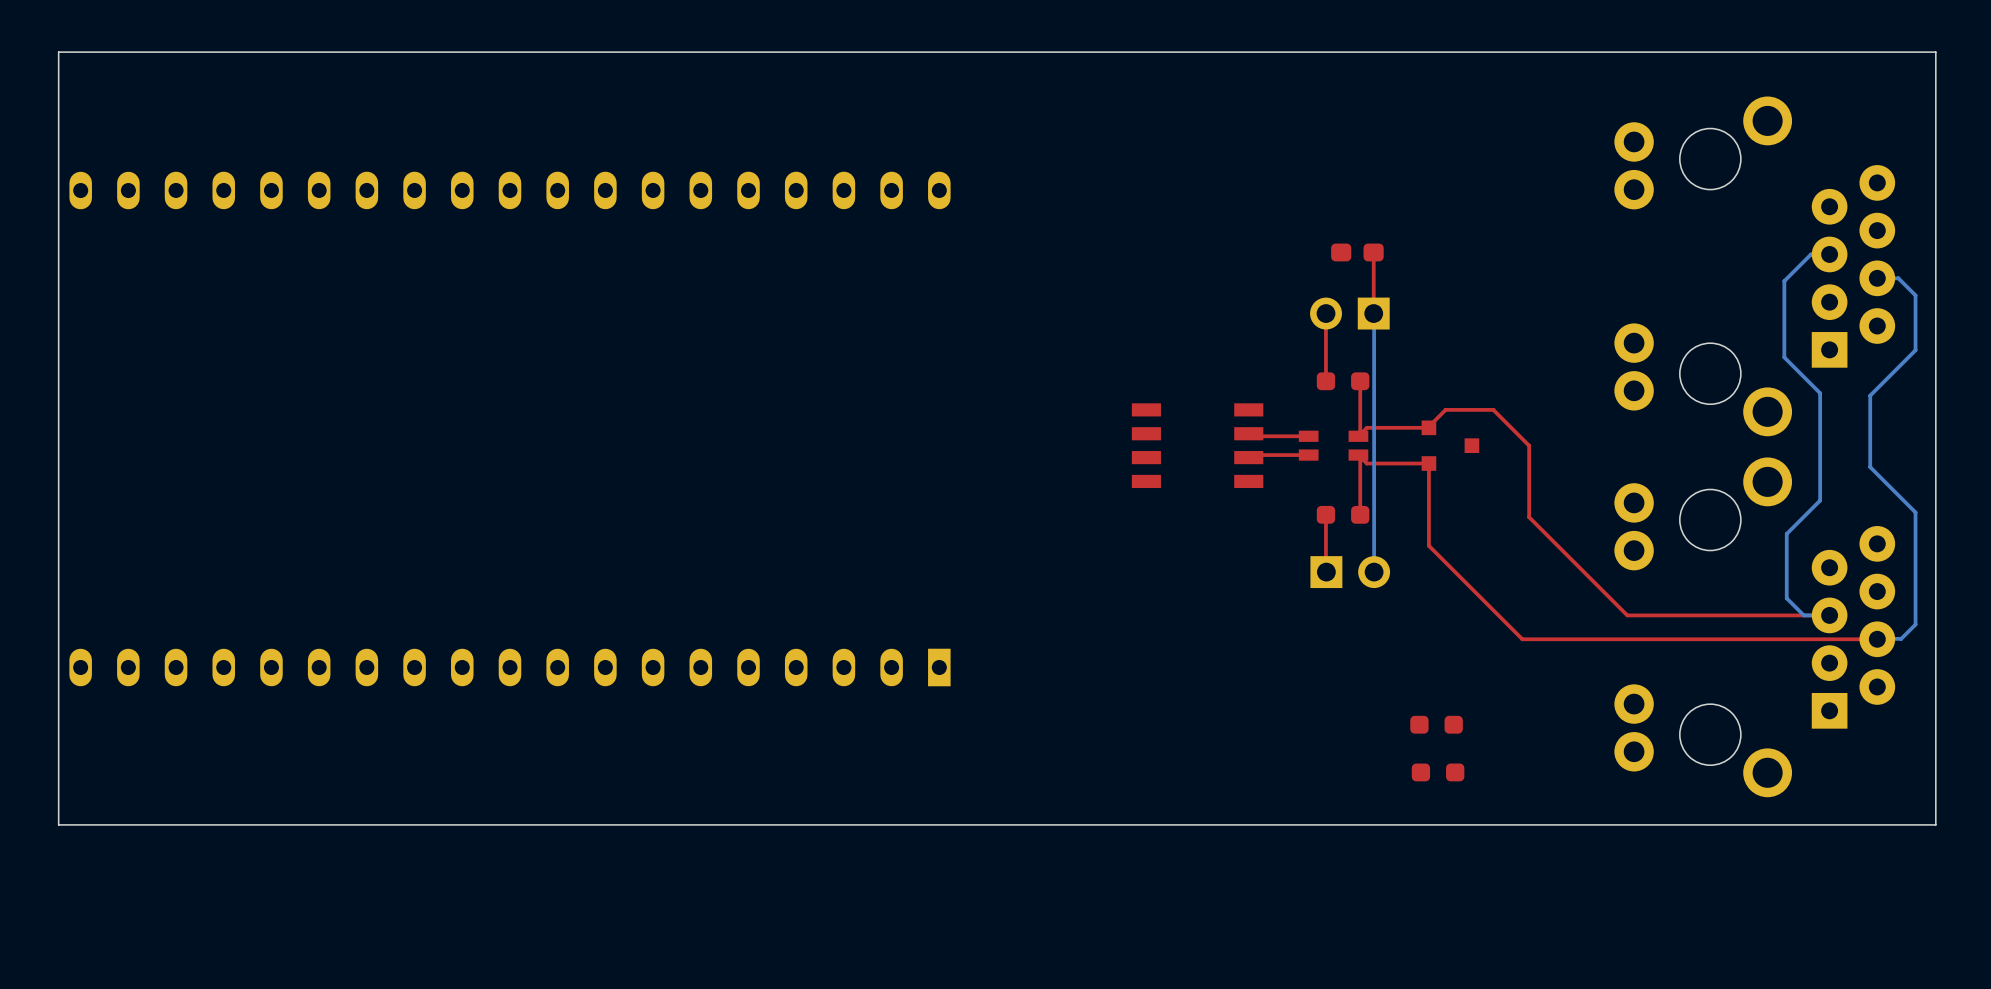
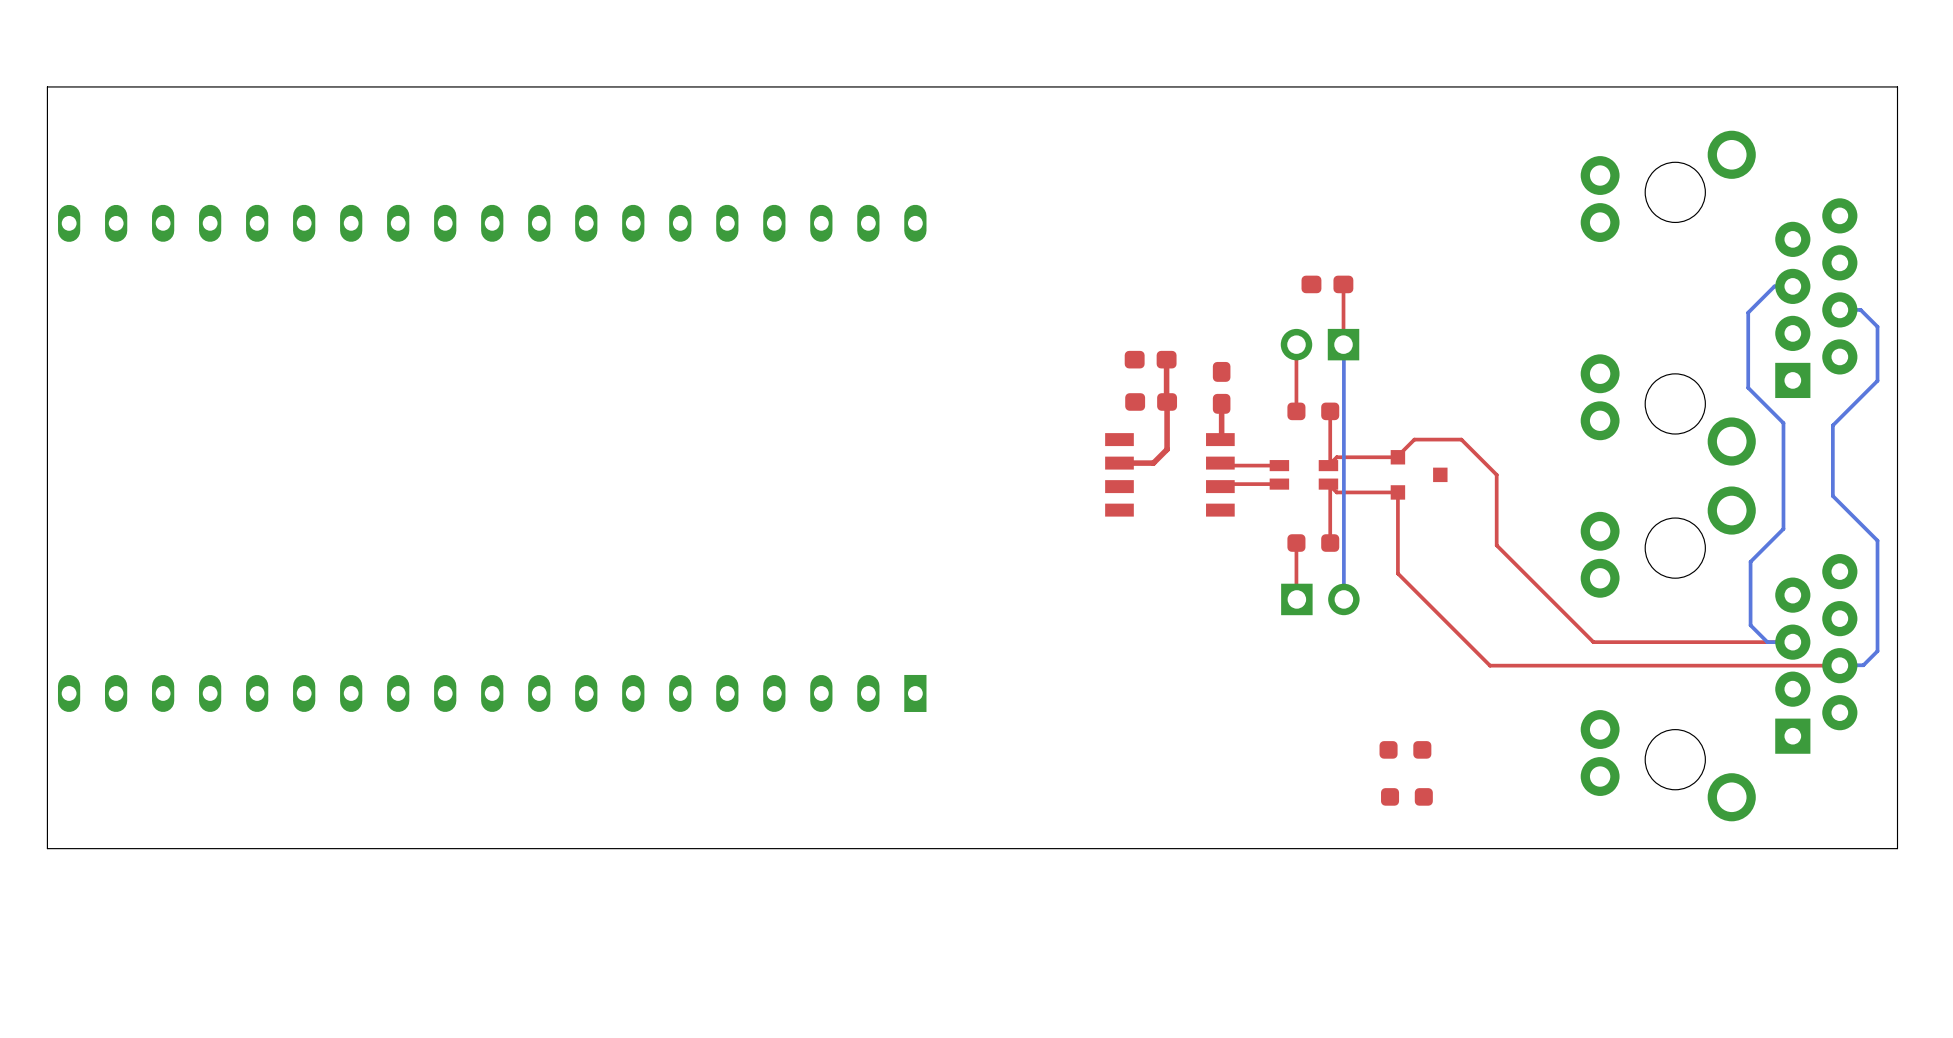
part: none -> (1150, 359)
top track: none -> (1166, 359) (1167, 449) (1153, 463) (1119, 463)
part: none -> (1221, 387)
part: none -> (1151, 401)
top track: none -> (1221, 403) (1220, 439)

